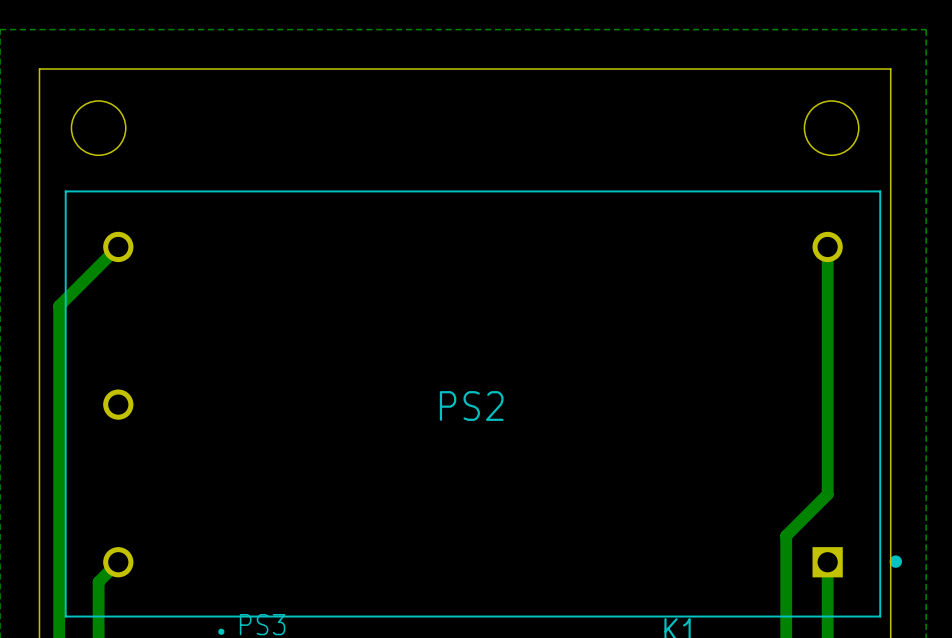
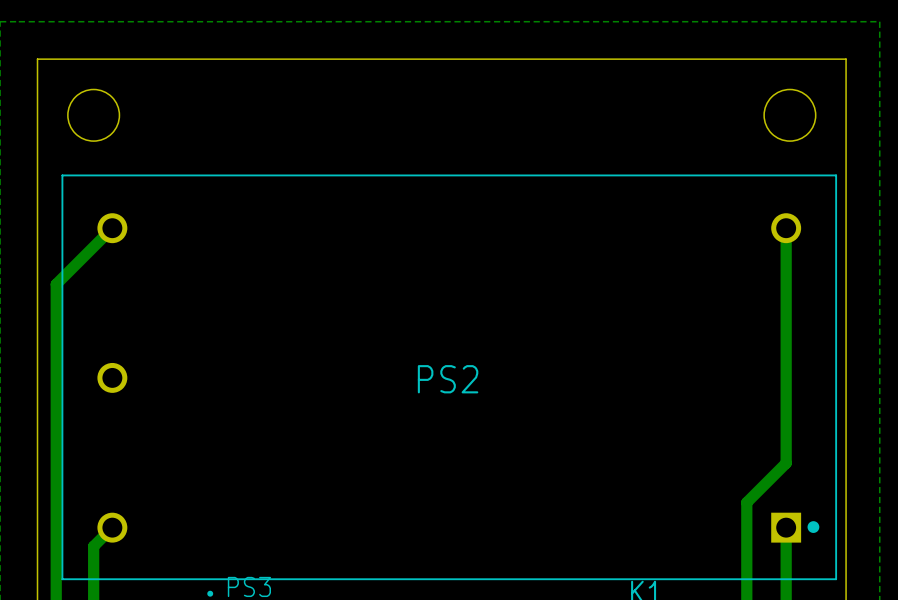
PS2 footprint: [64, 190, 902, 618] -> [61, 174, 838, 581]

